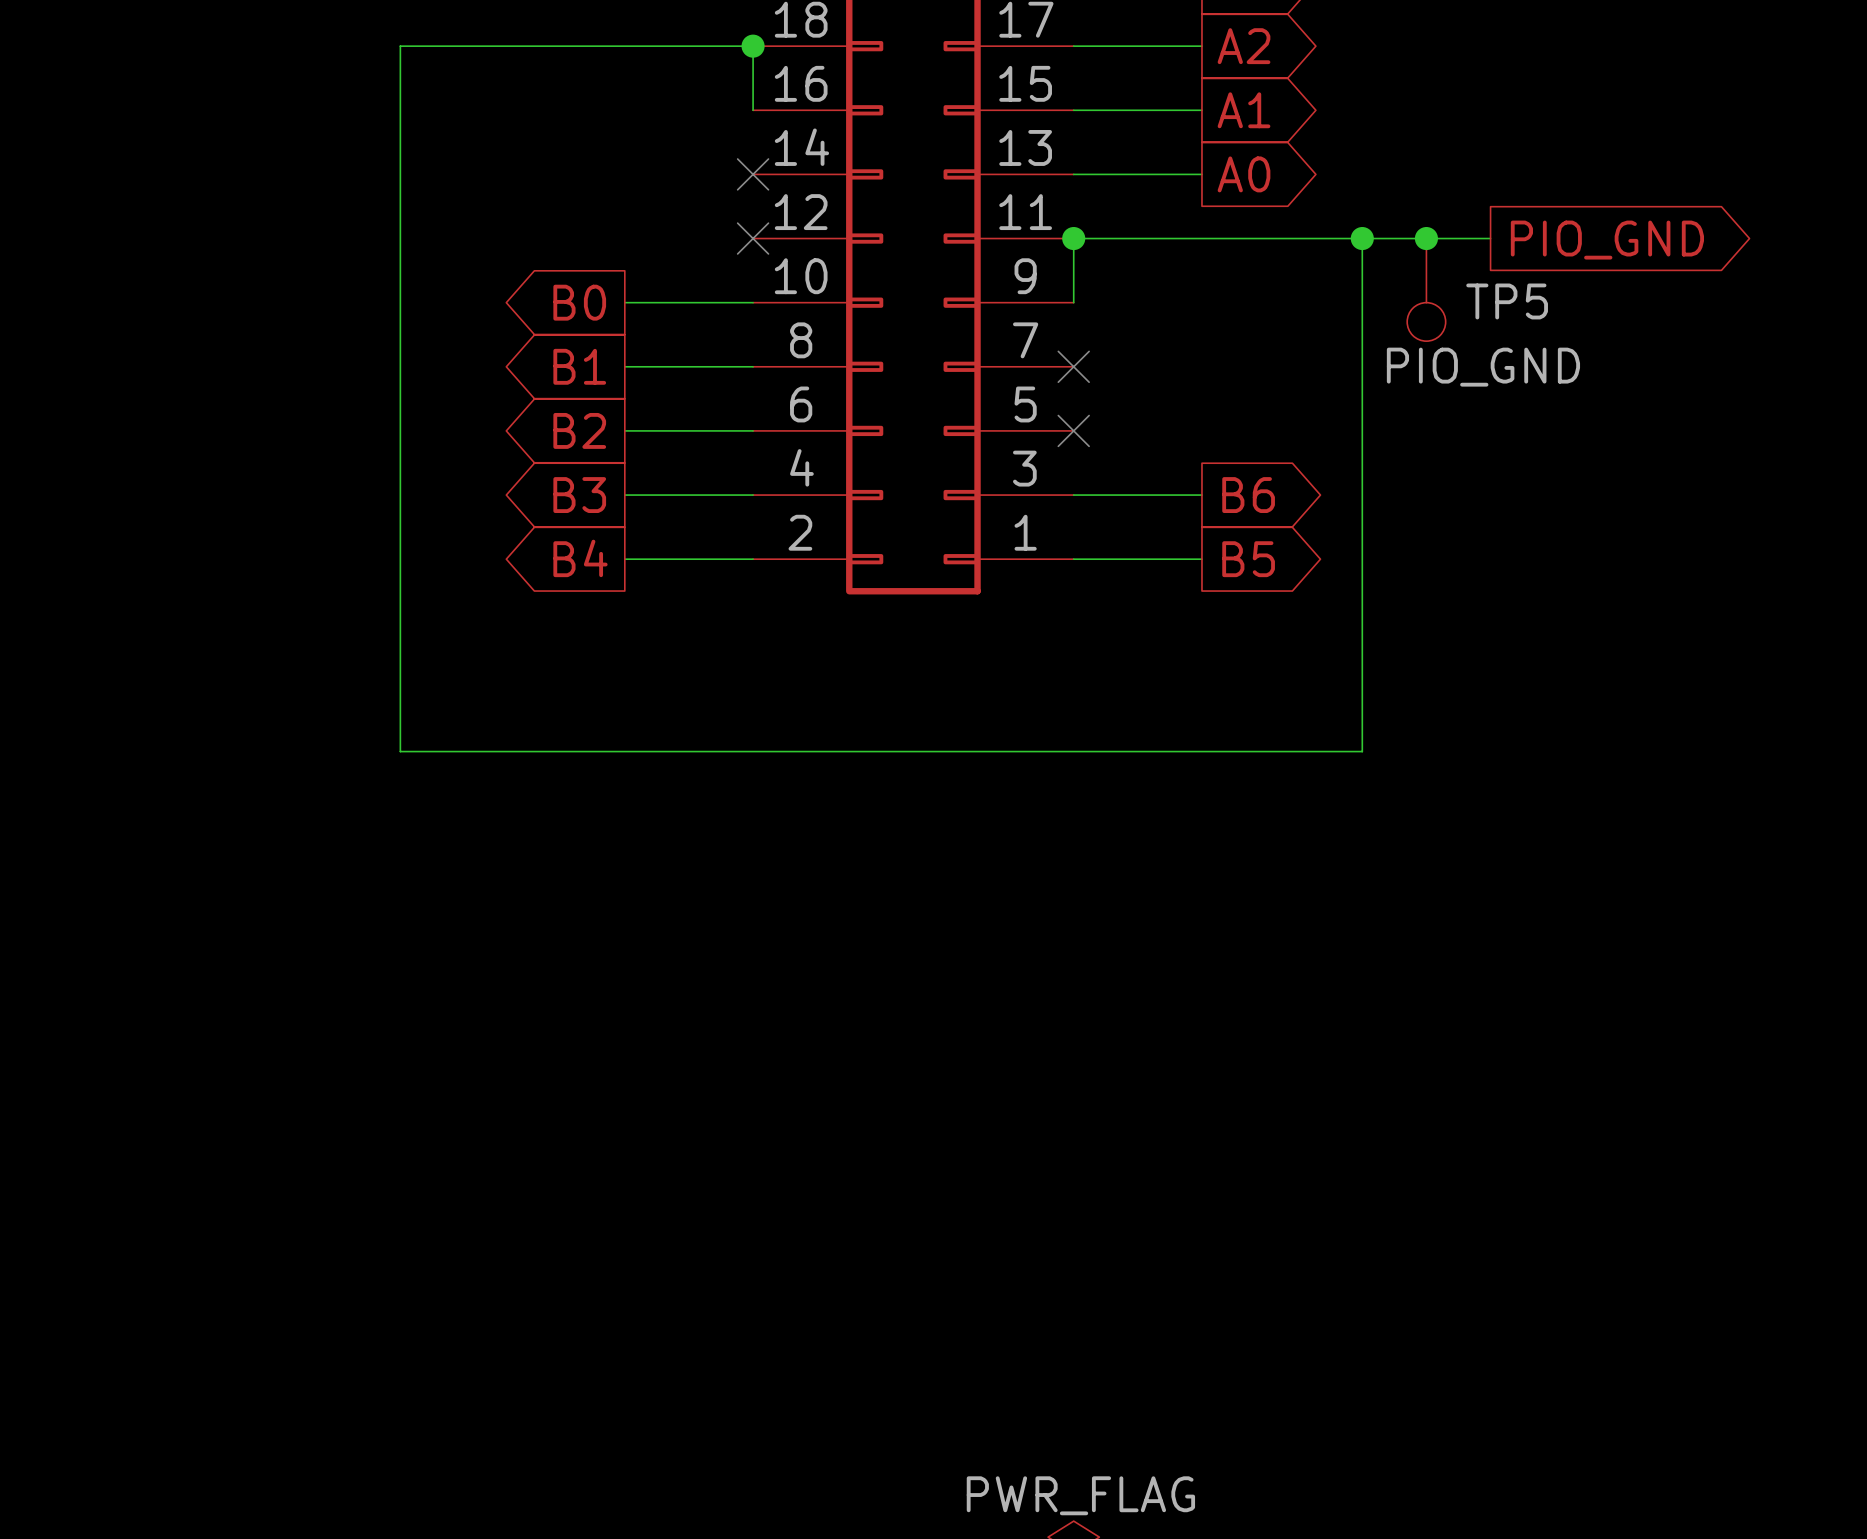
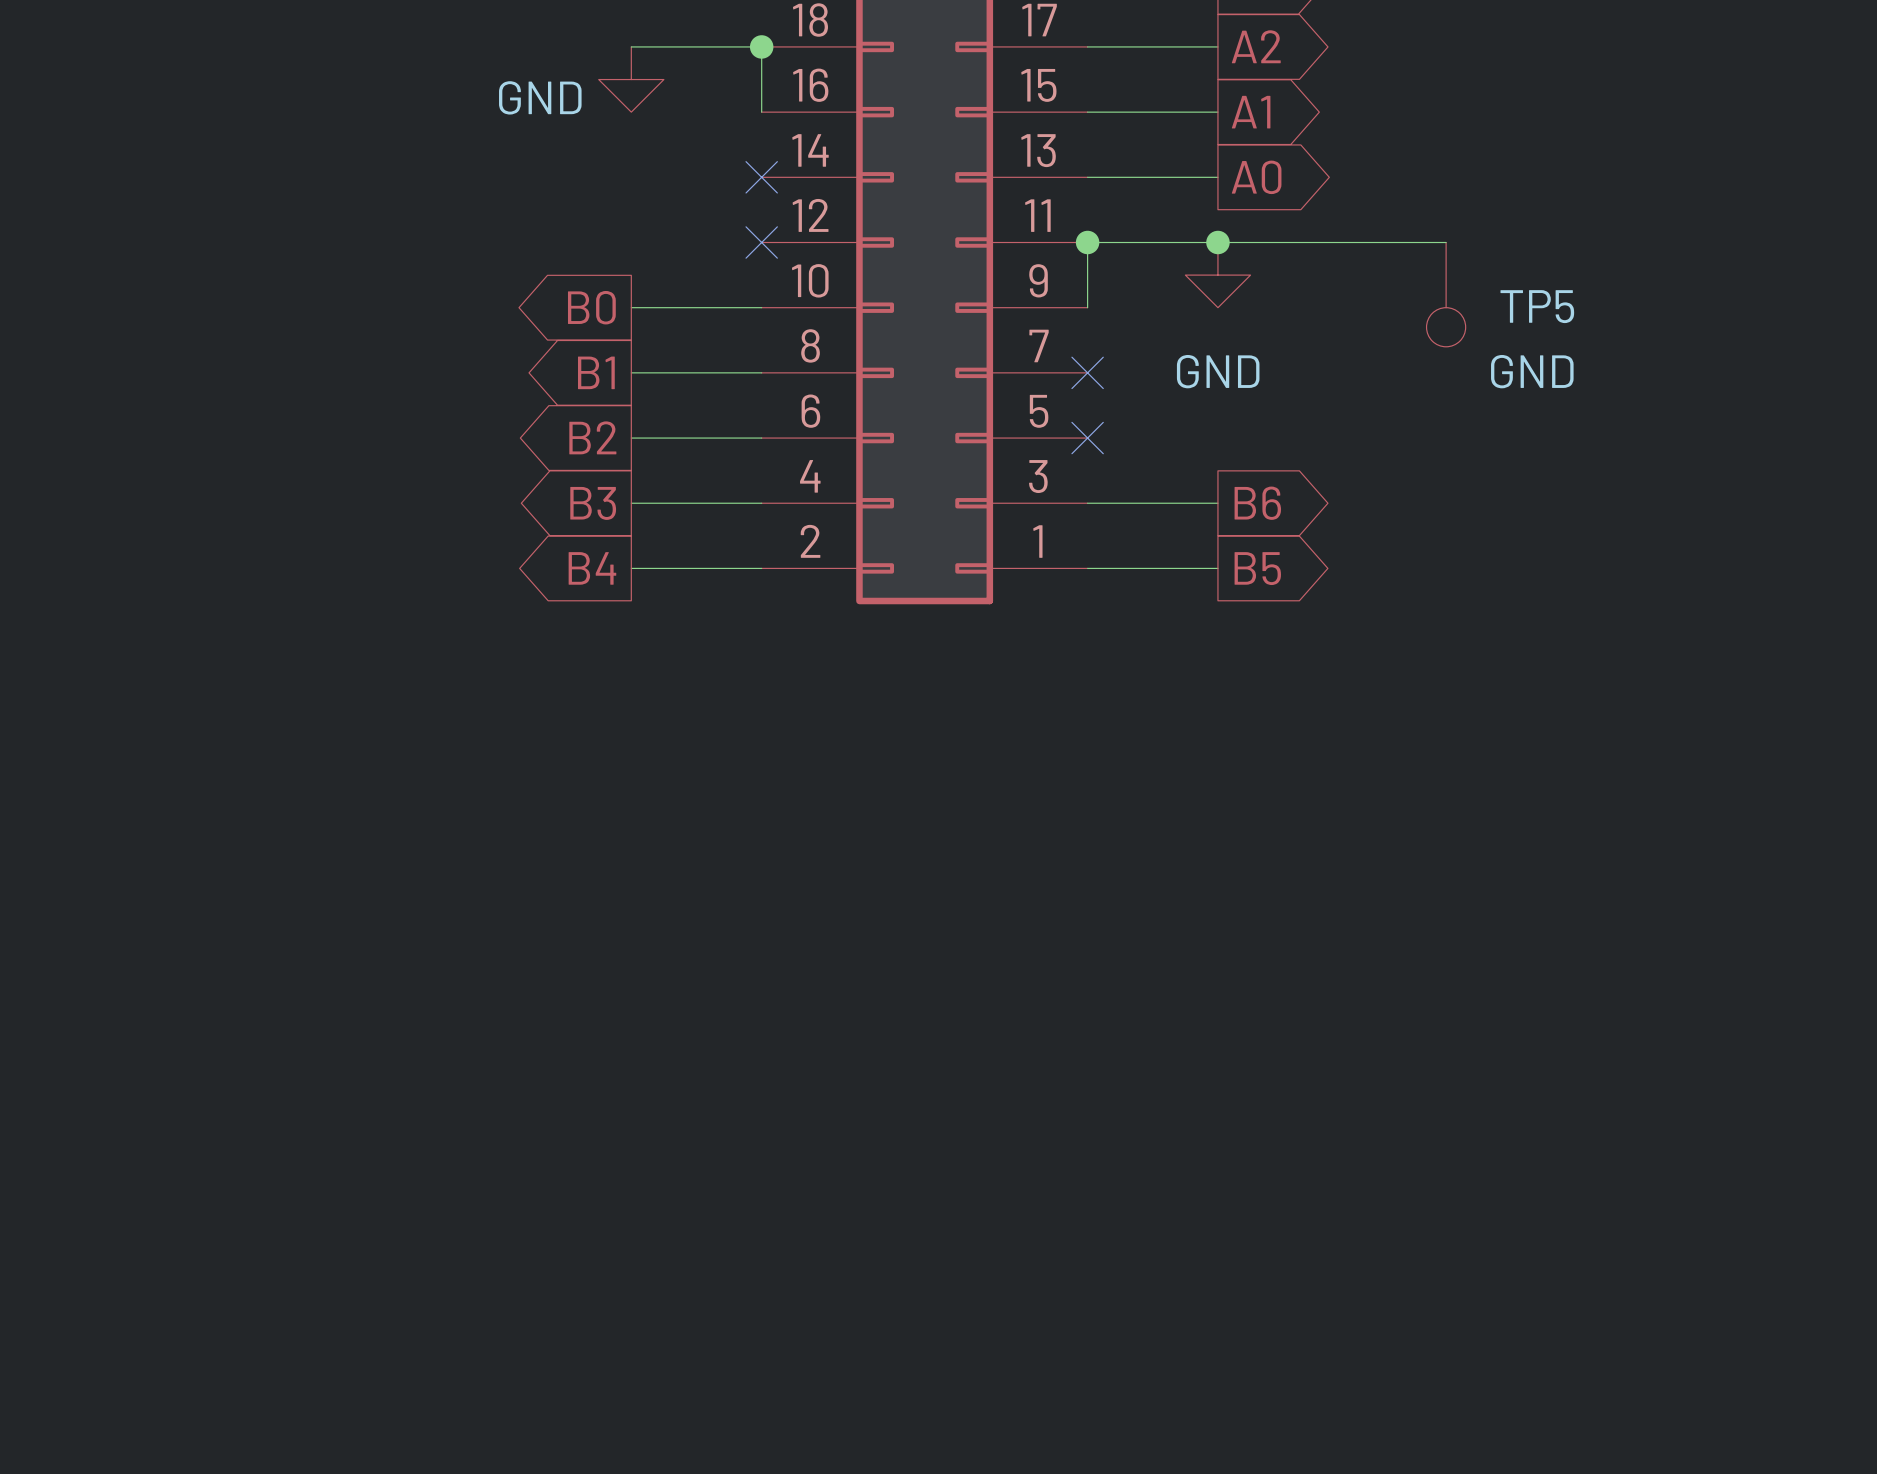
wire: (624, 46) (400, 46) (400, 751) (1362, 751) (1362, 238) -> none
power symbol: none -> GND (631, 79)
junction: none -> (1217, 242)
junction: (1362, 238) -> none
wire: (1426, 238) (1490, 238) -> none
junction: (1426, 238) -> none
global label: PIO_GND (1607, 240) -> none
power symbol: none -> GND (1217, 275)
TP5 value: PIO_GND (1483, 367) -> GND (1532, 371)

